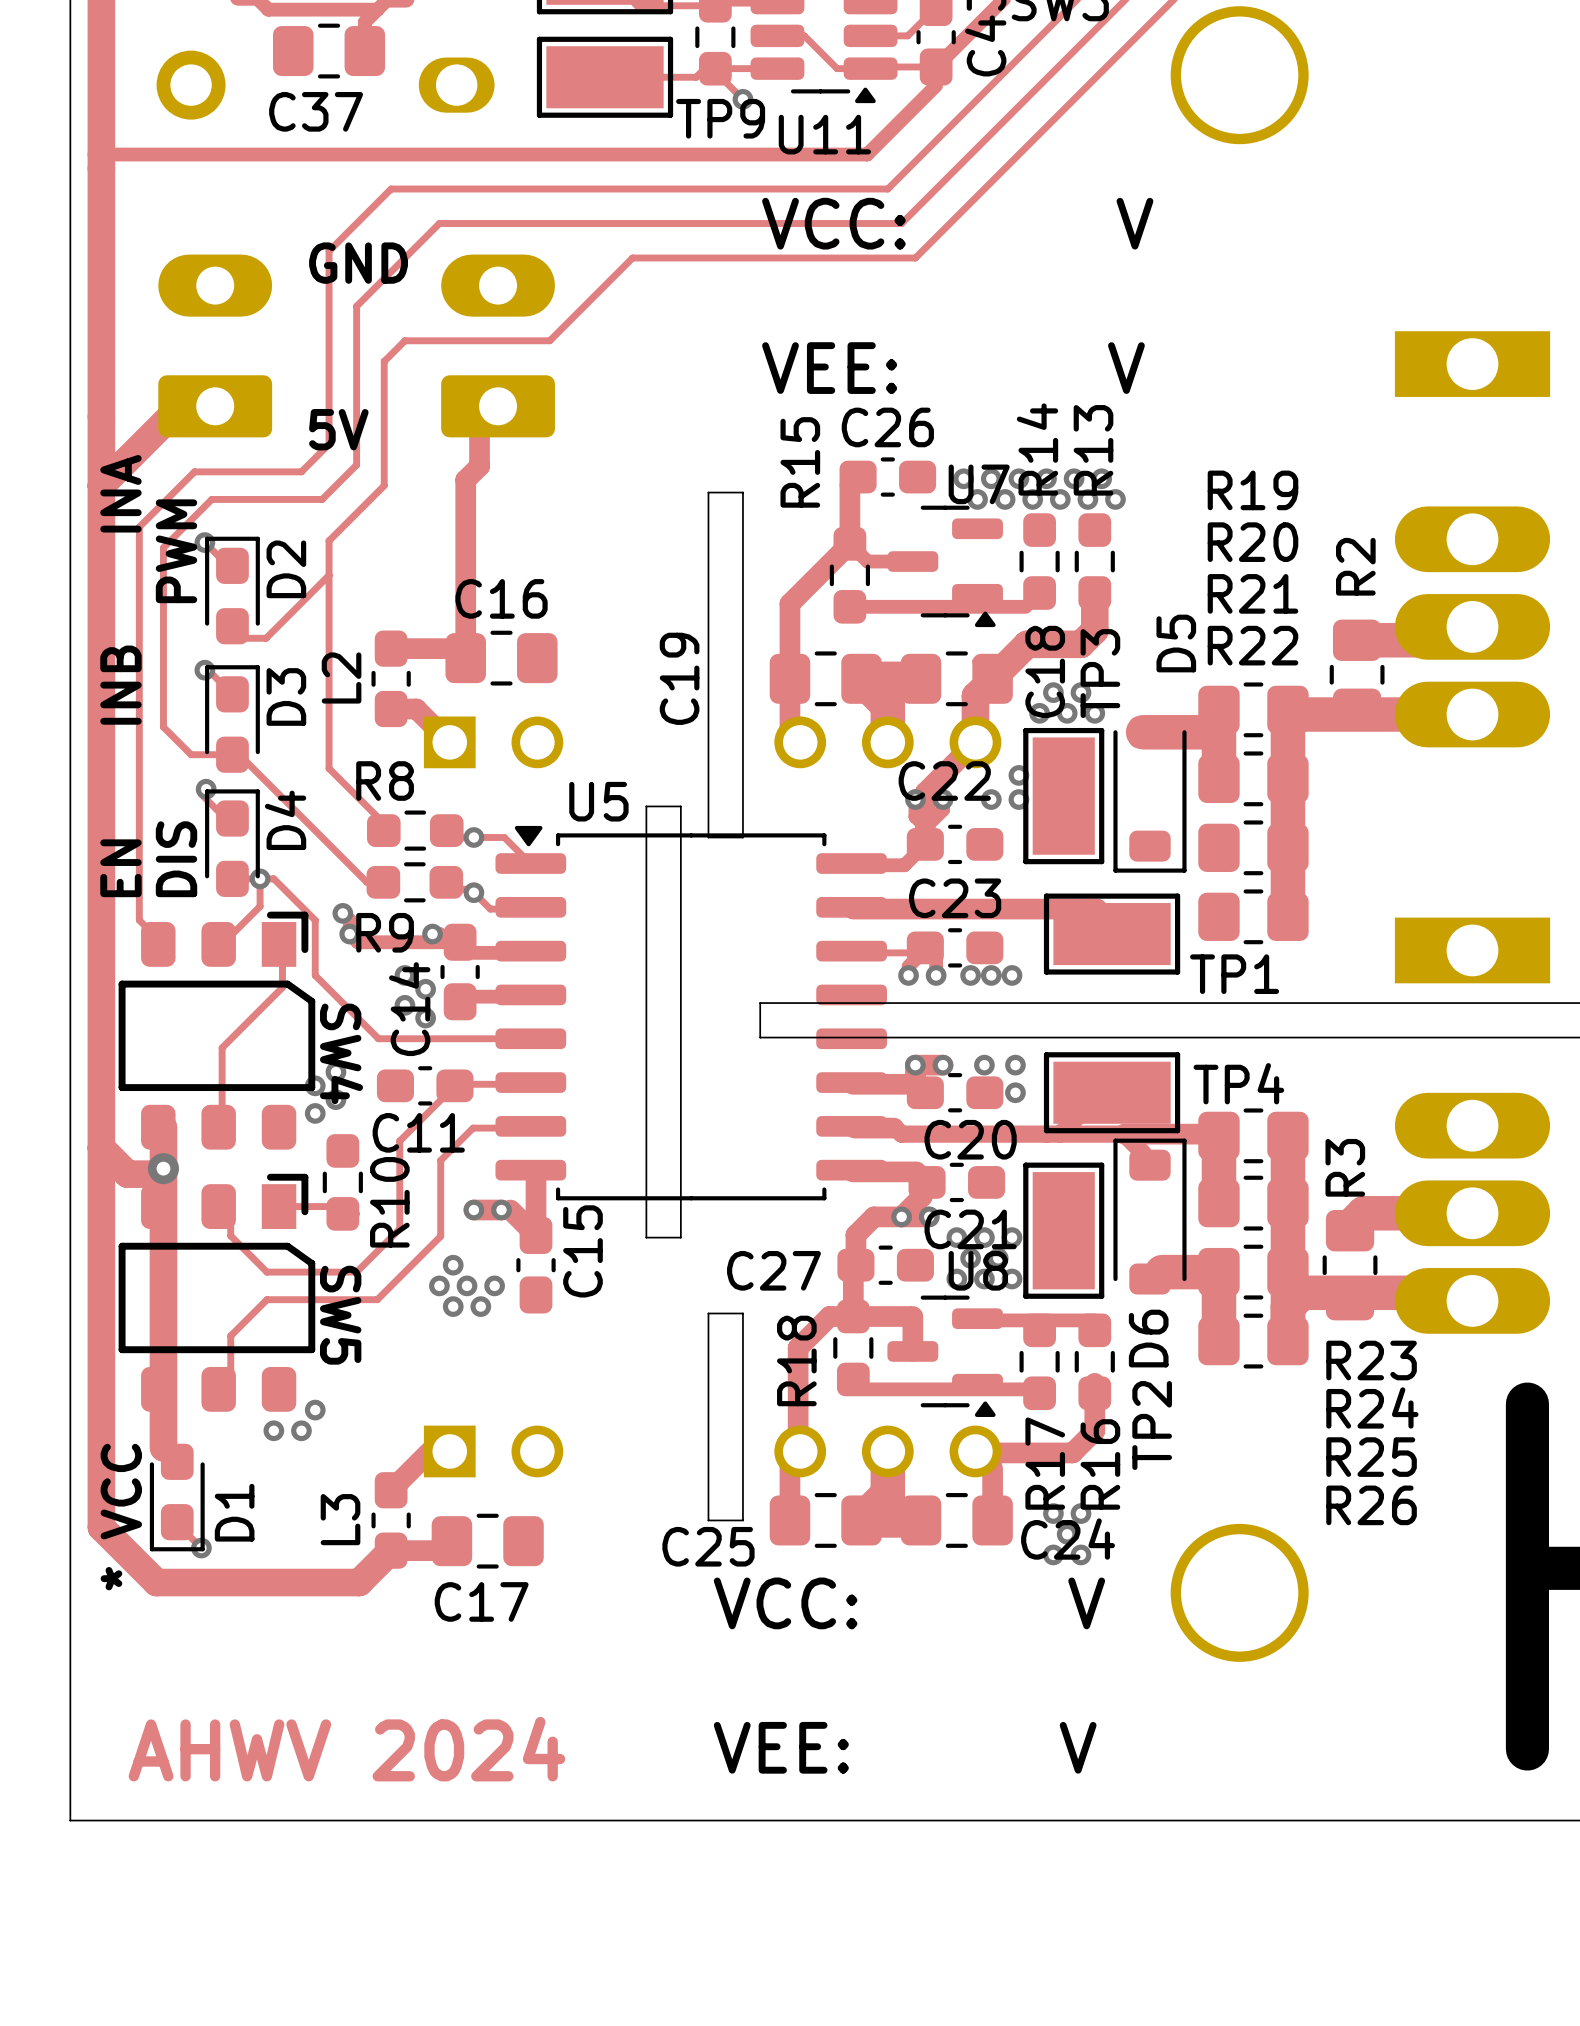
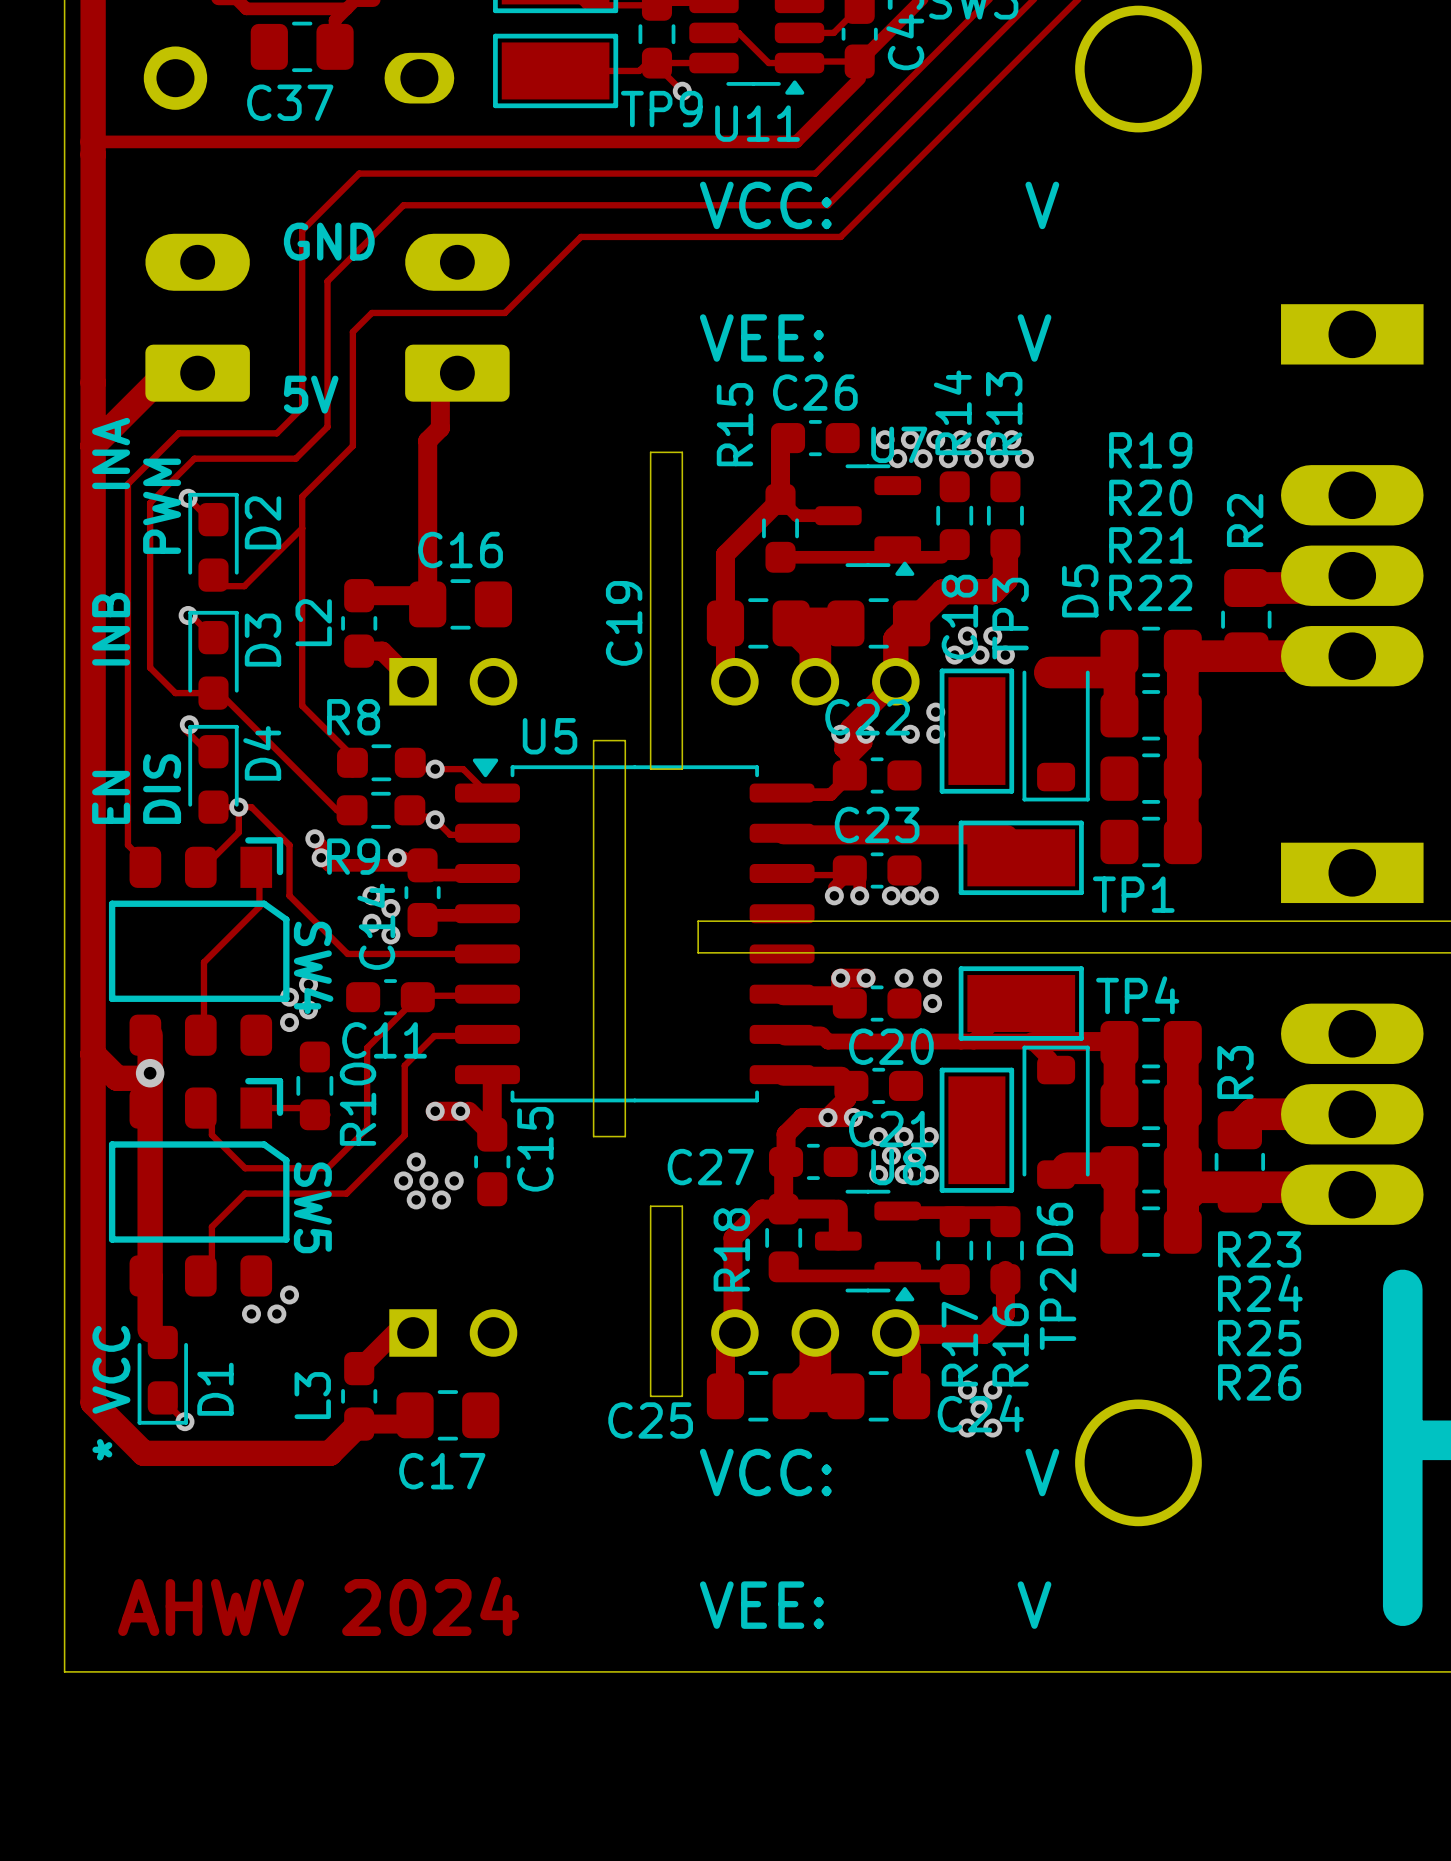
text position: VCC: V (909, 1603) -> VCC: V (879, 1472)
text position: VEE: V (905, 1747) -> VEE: V (875, 1605)

